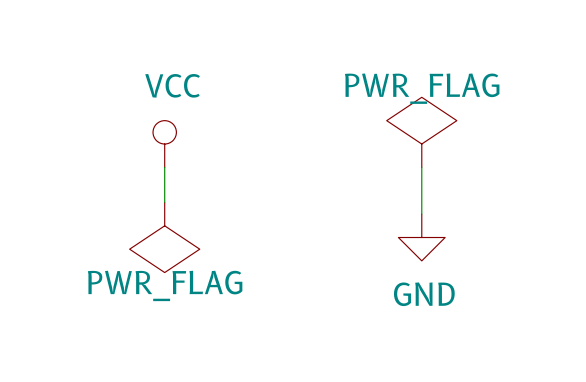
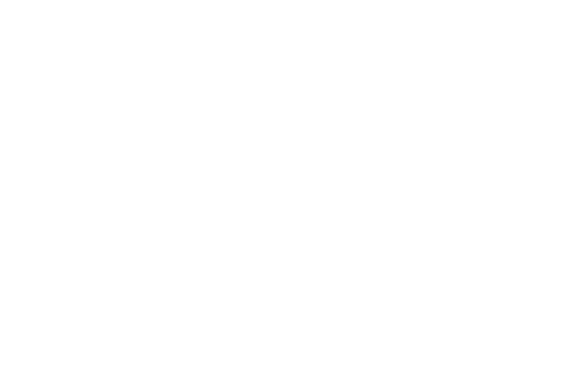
power symbol: PWR_FLAG (421, 132) -> none
power symbol: VCC (164, 144) -> none
wire: (164, 167) (164, 202) -> none
wire: (421, 167) (421, 214) -> none
power symbol: PWR_FLAG (164, 237) -> none
power symbol: GND (421, 237) -> none

